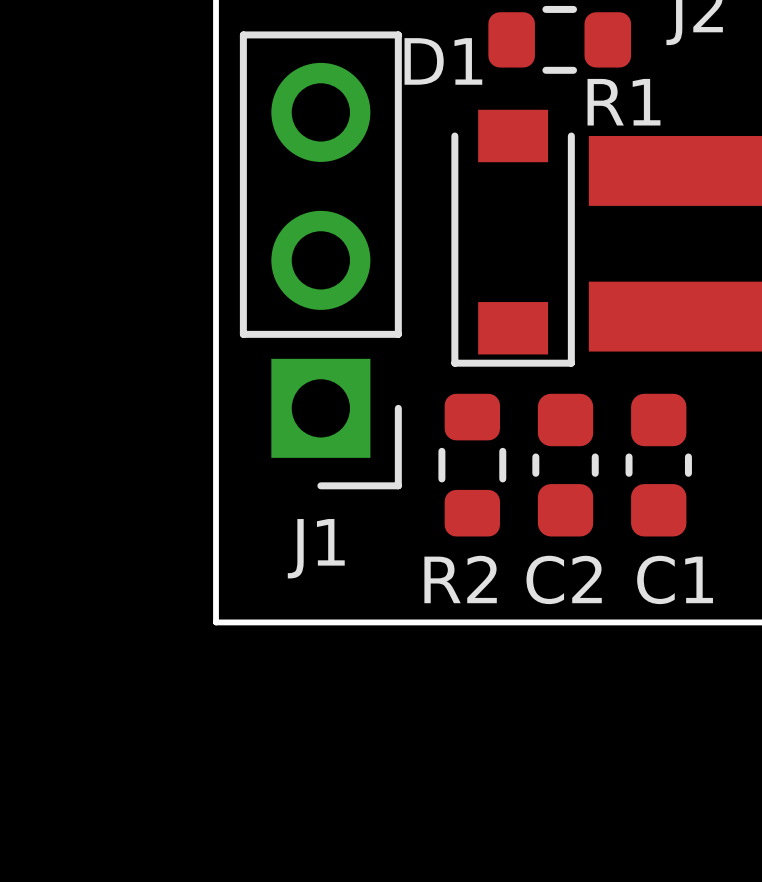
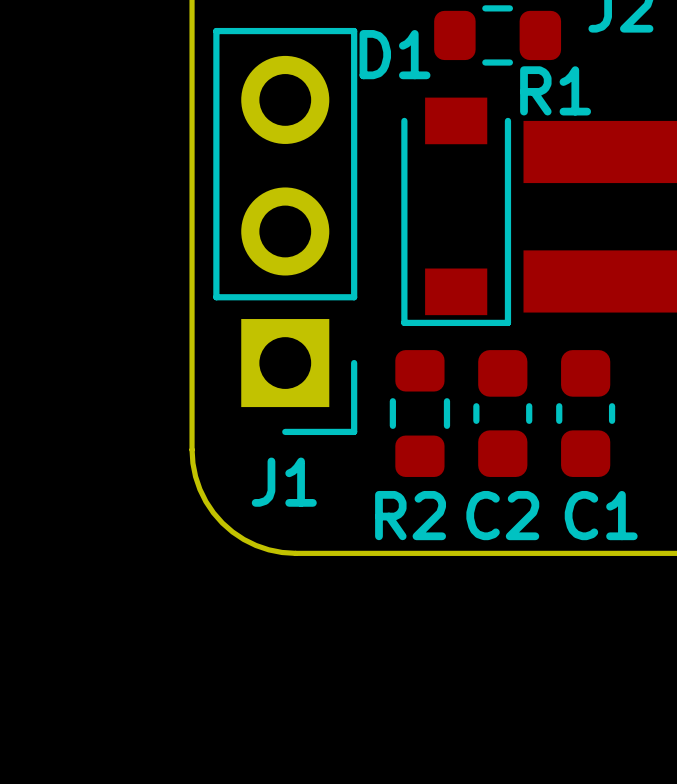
board edge: (216, 505) (216, 622) (332, 622) -> (192, 449) (192, 463) (199, 489) (213, 512) (222, 523) (243, 539) (255, 545) (268, 549) (295, 553)

